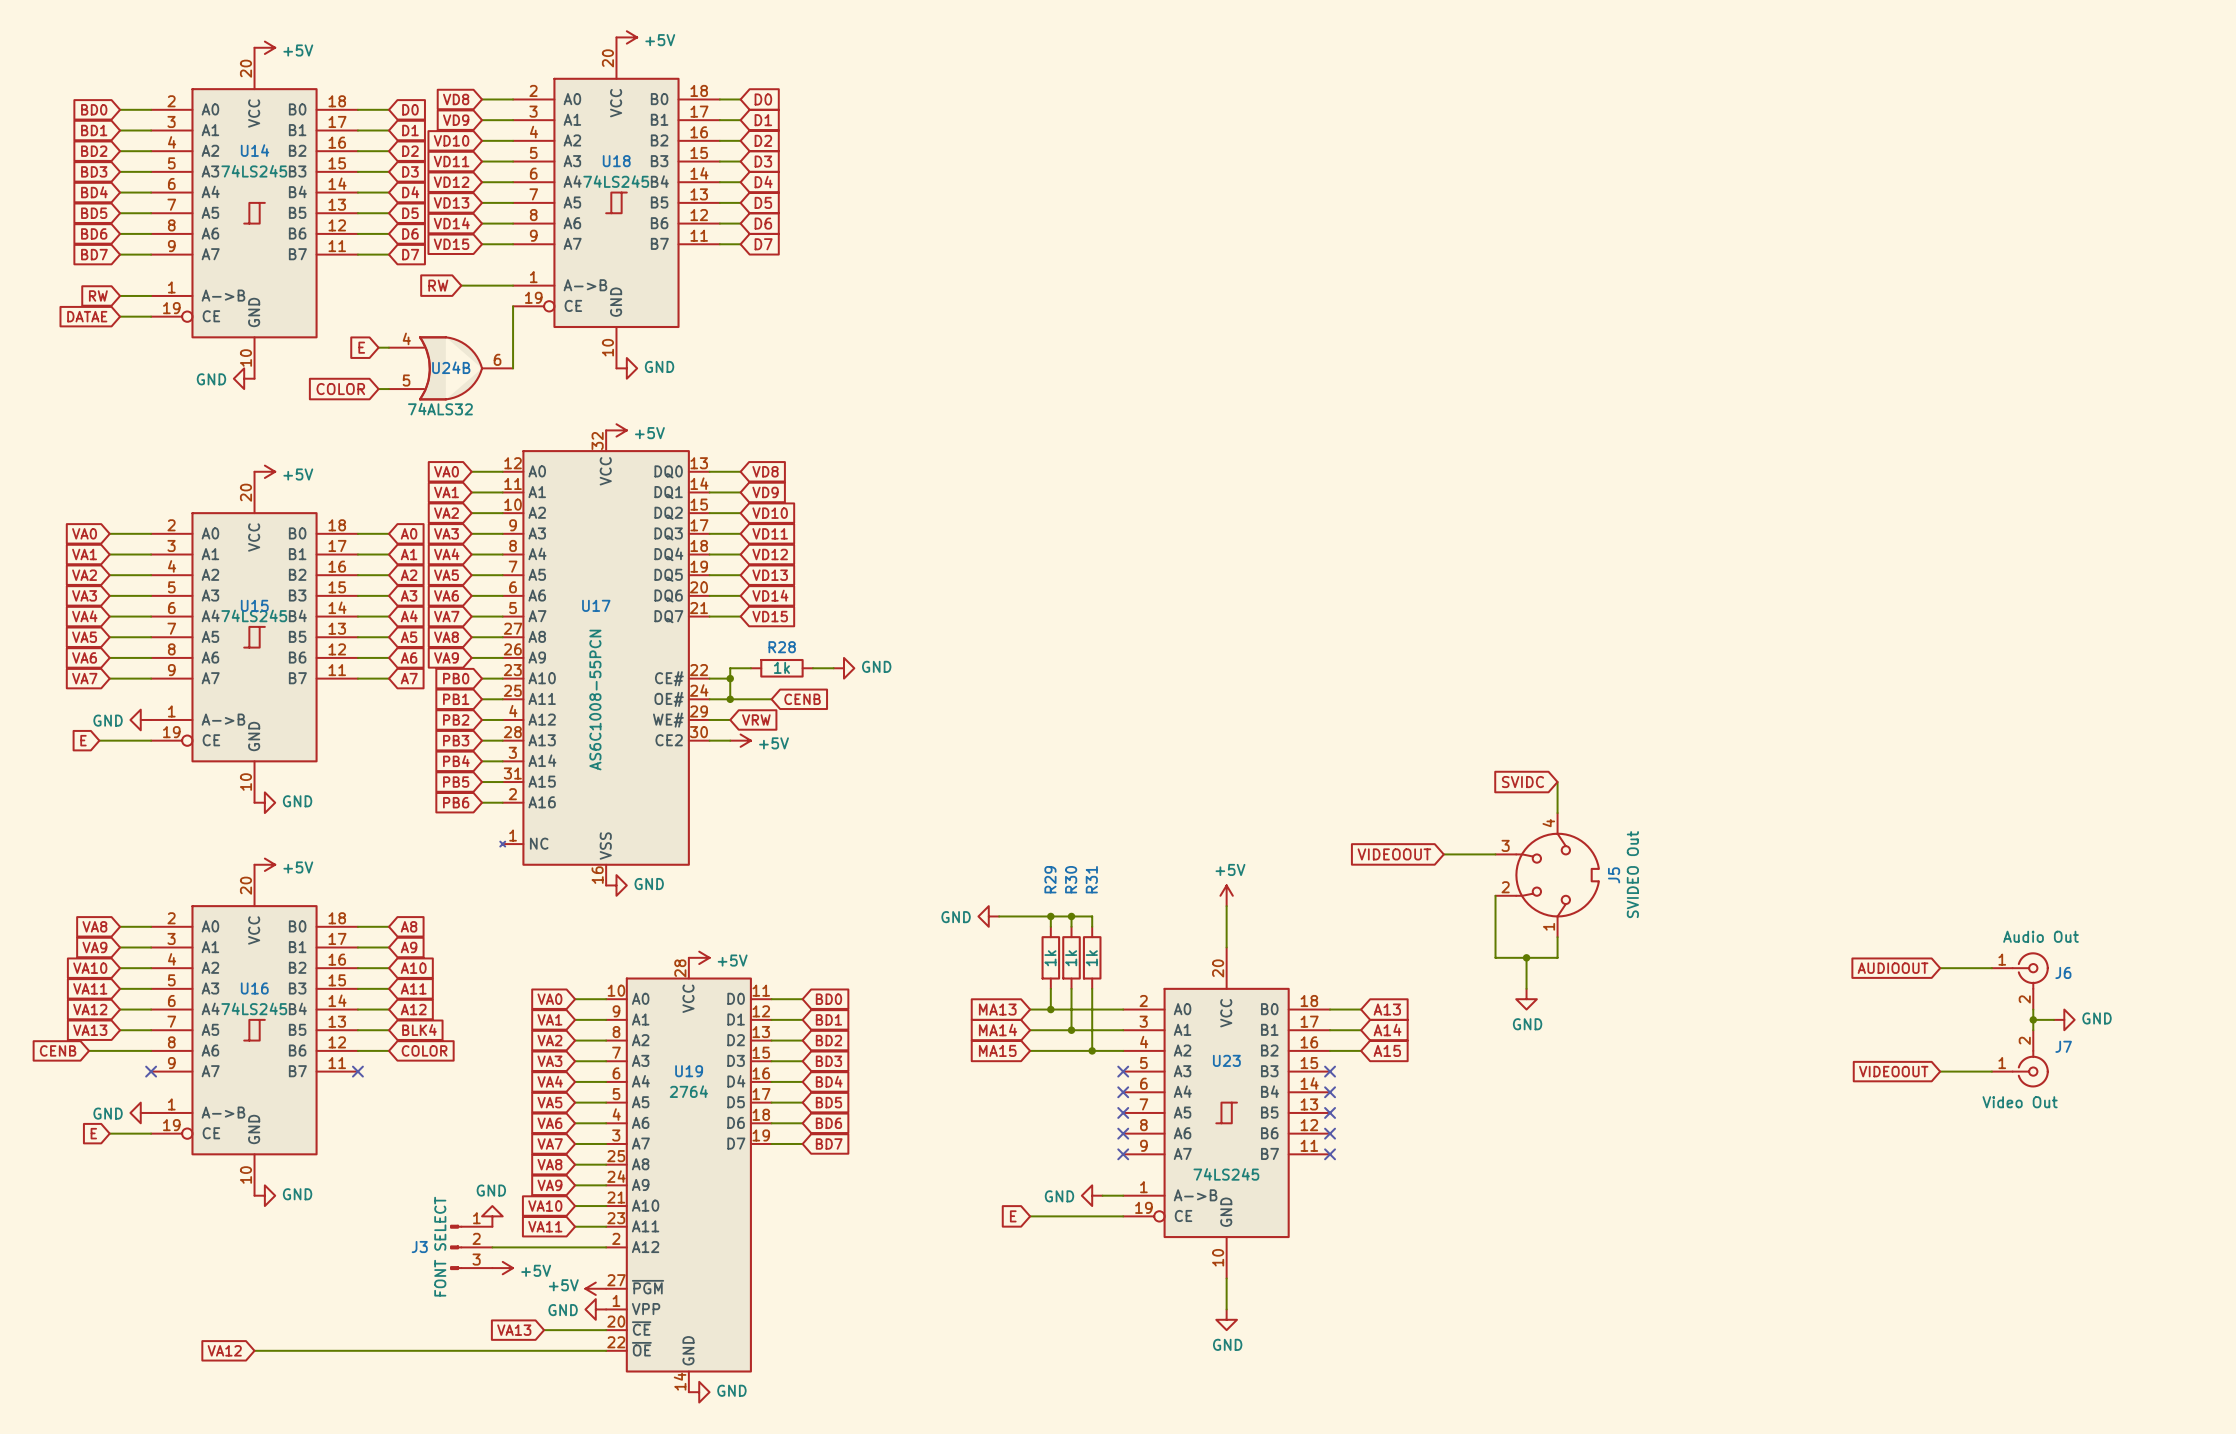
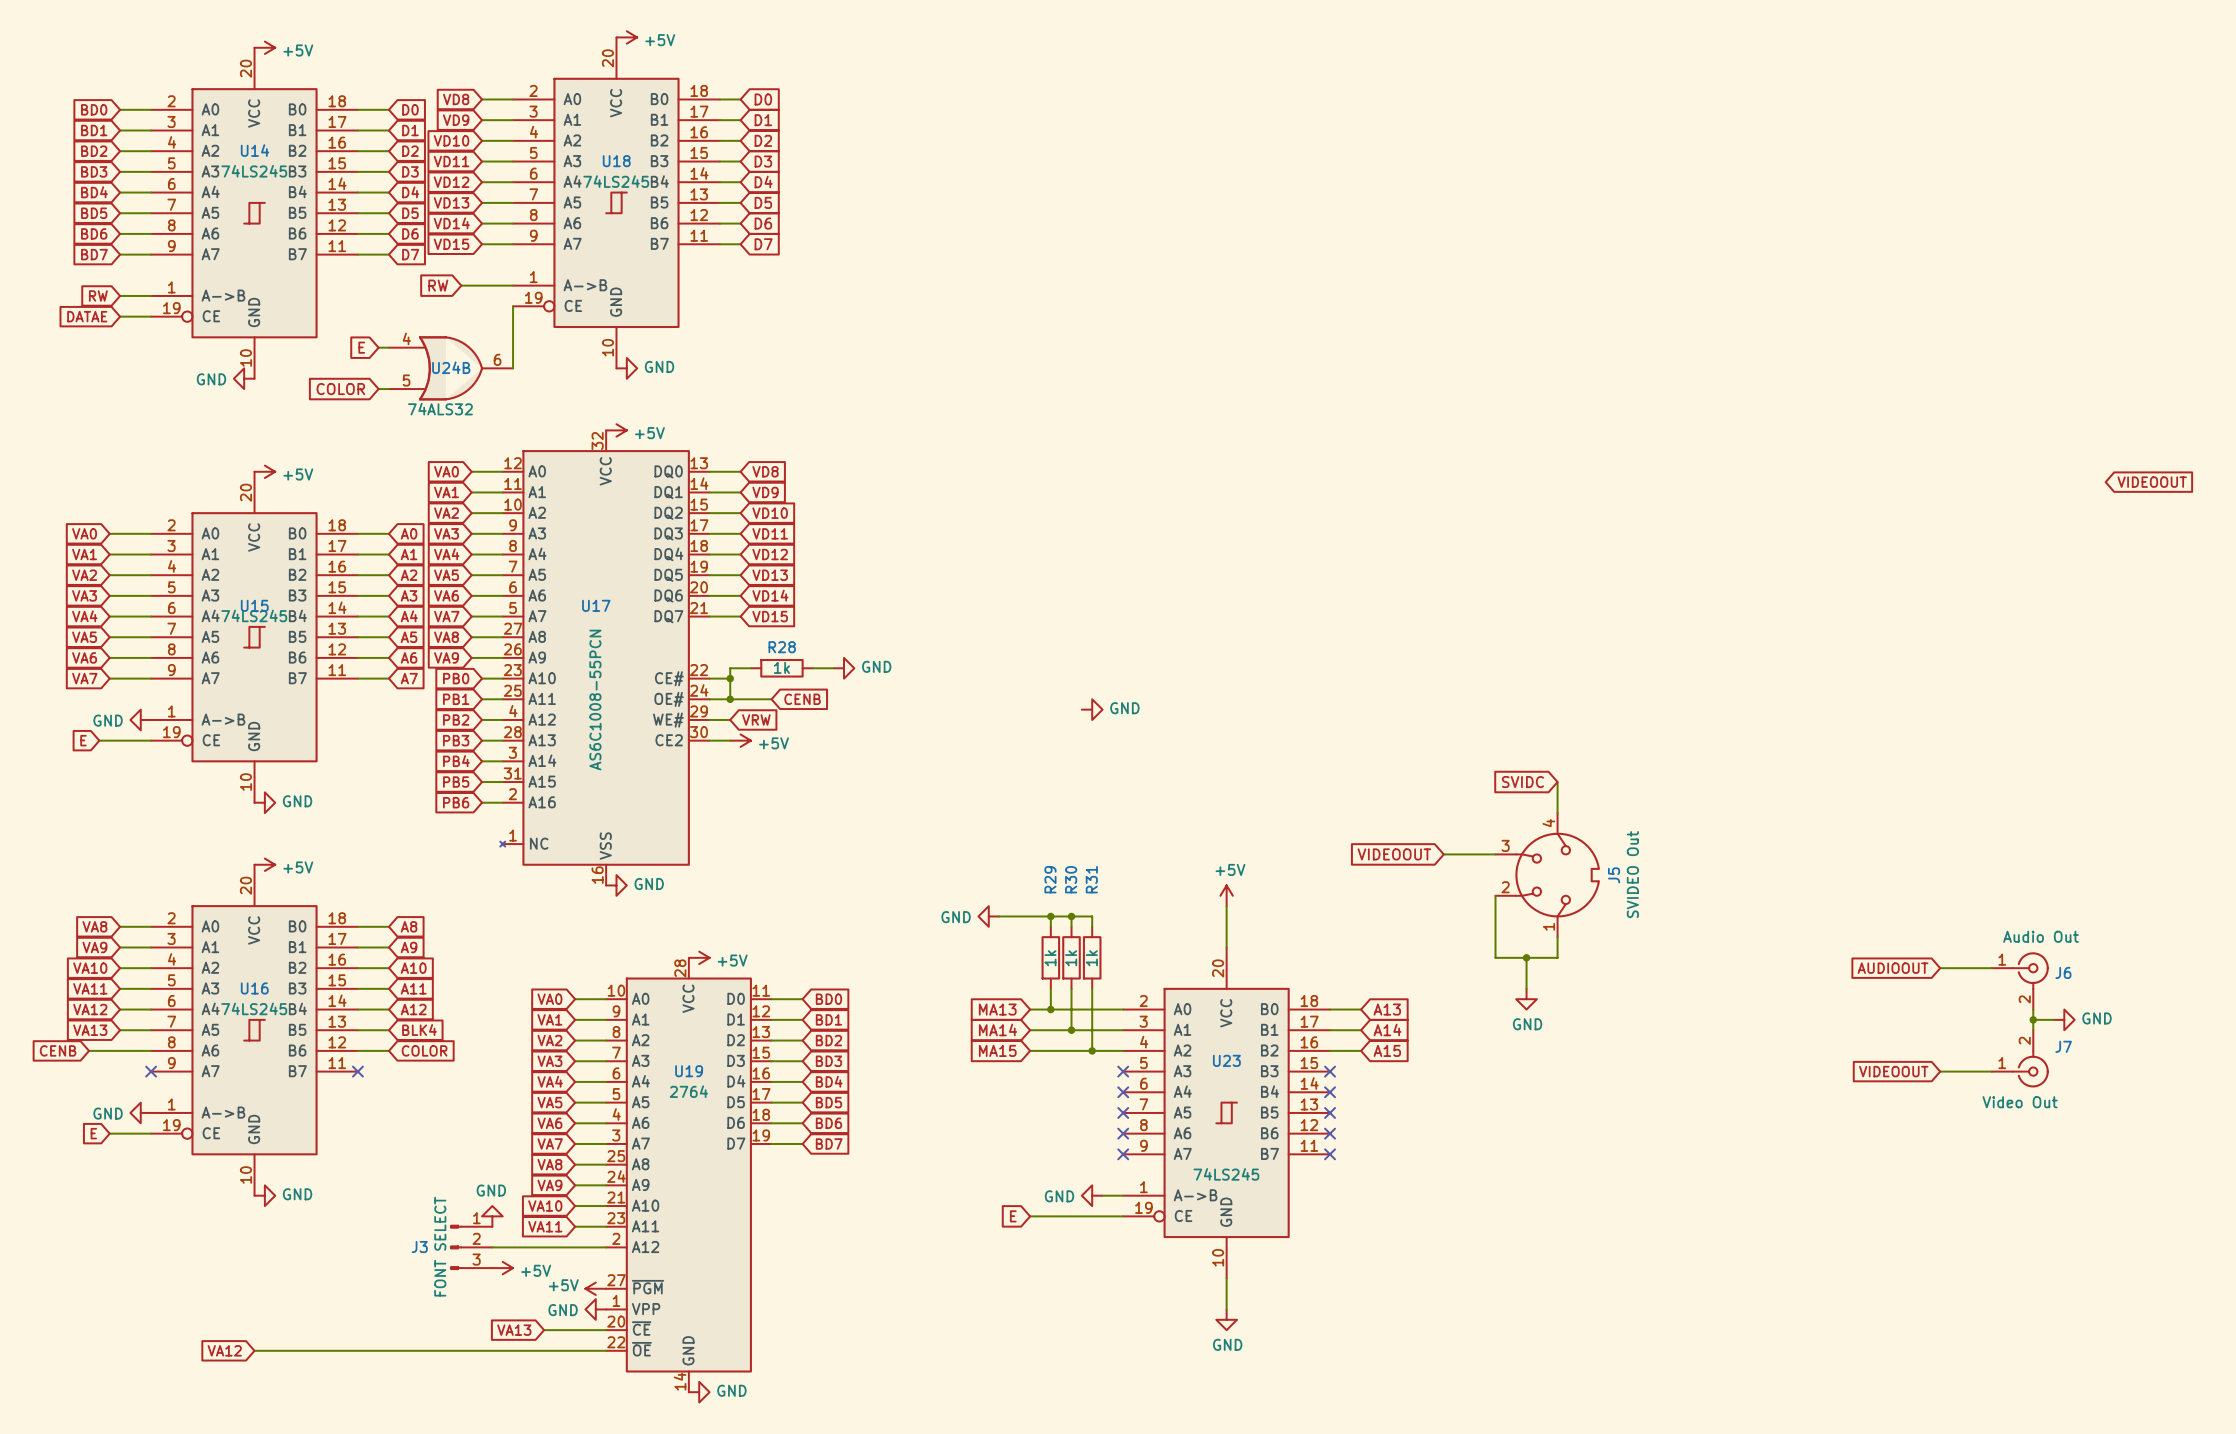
global label: none -> VIDEOOUT (2152, 482)
power symbol: none -> GND (1092, 709)

